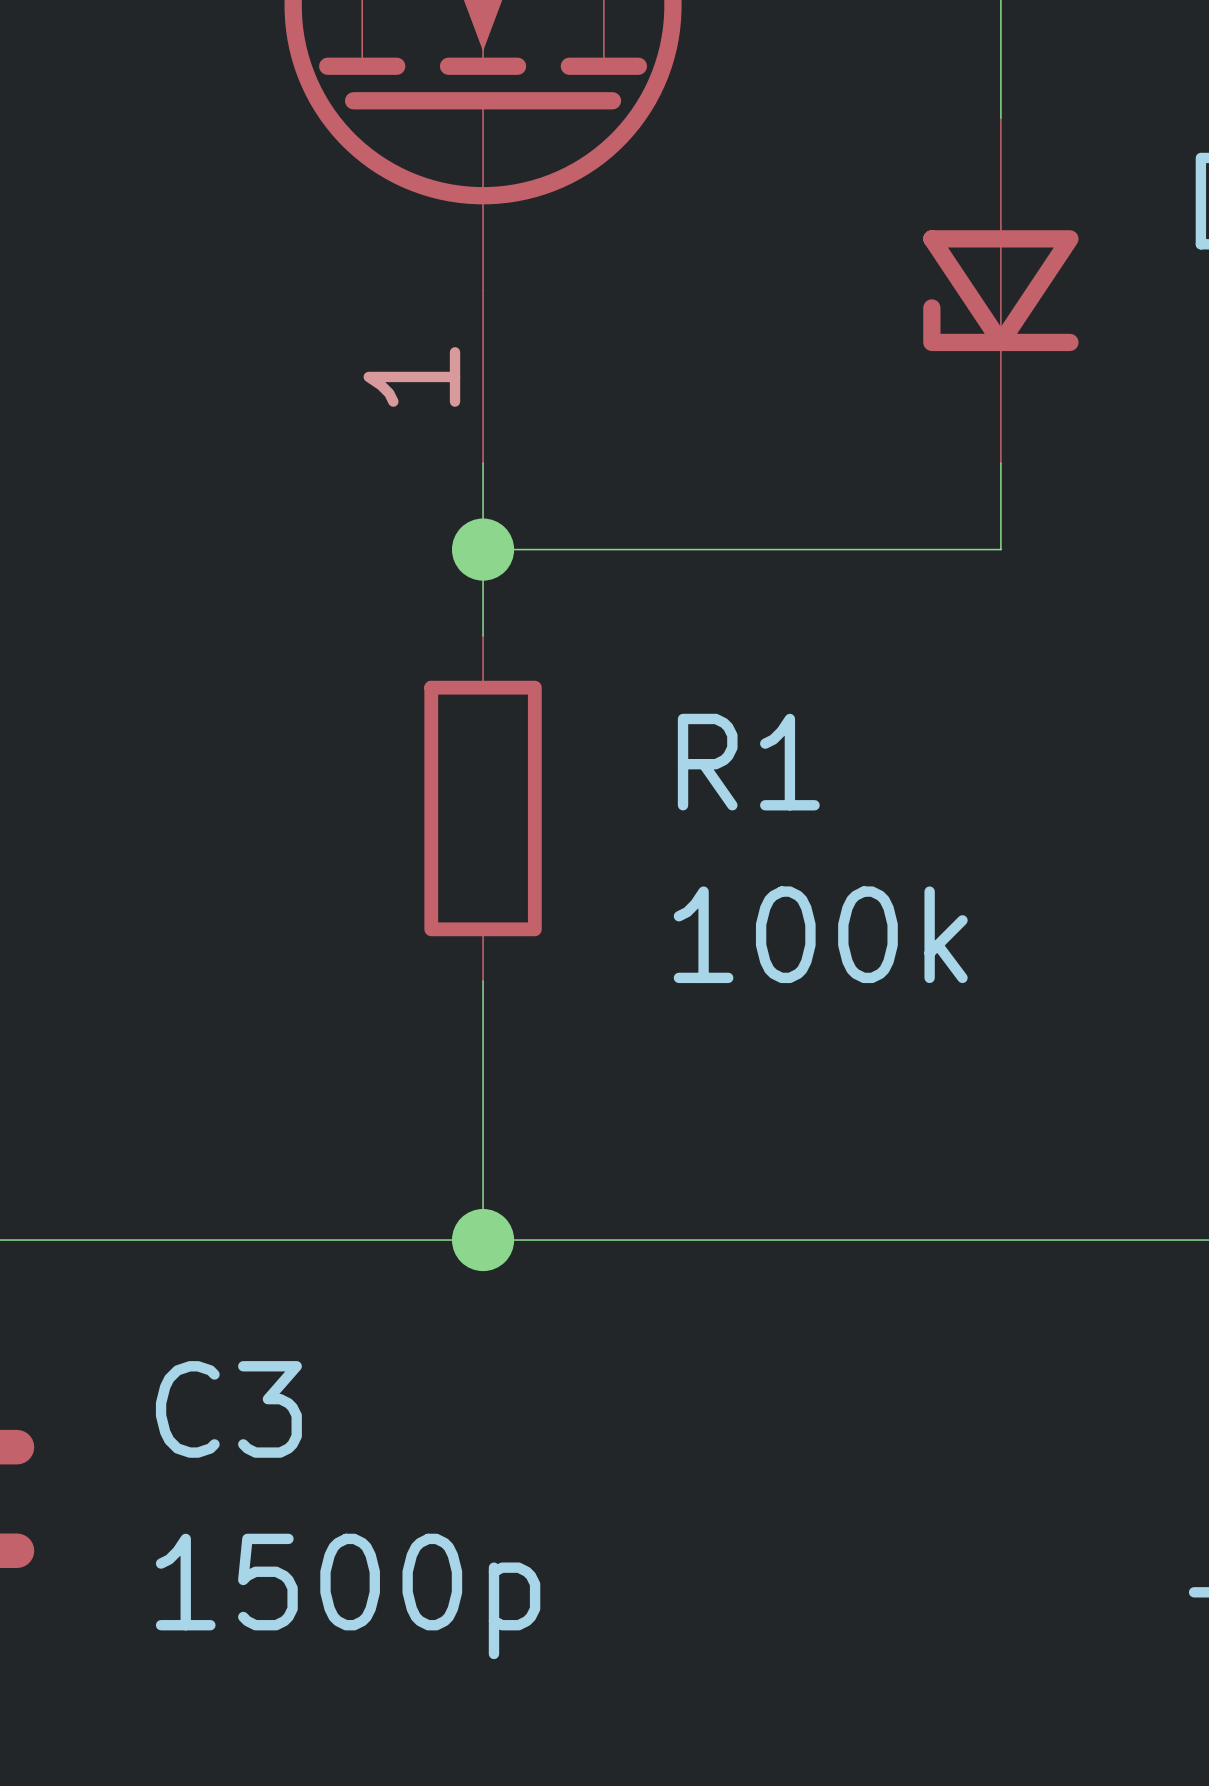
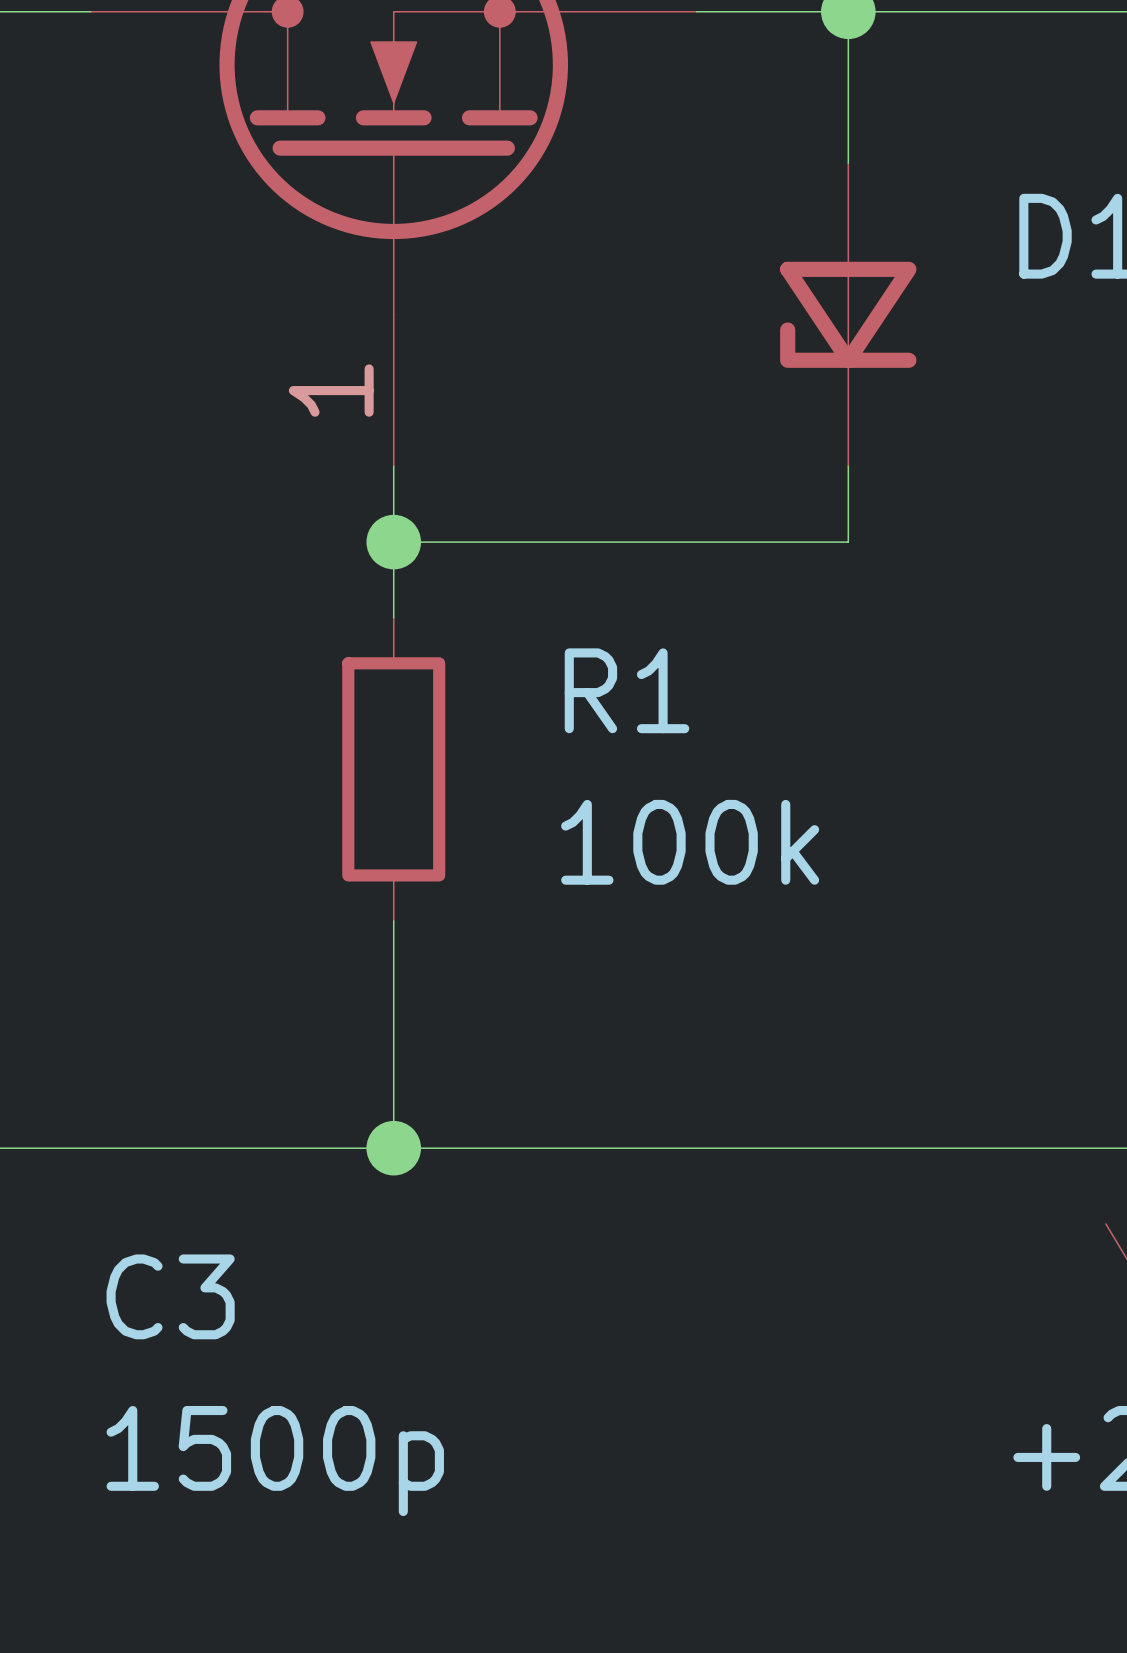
R1 name position: R1 (748, 762) -> R1 (627, 690)
R1 value position: 100k (820, 934) -> 100k (690, 842)

